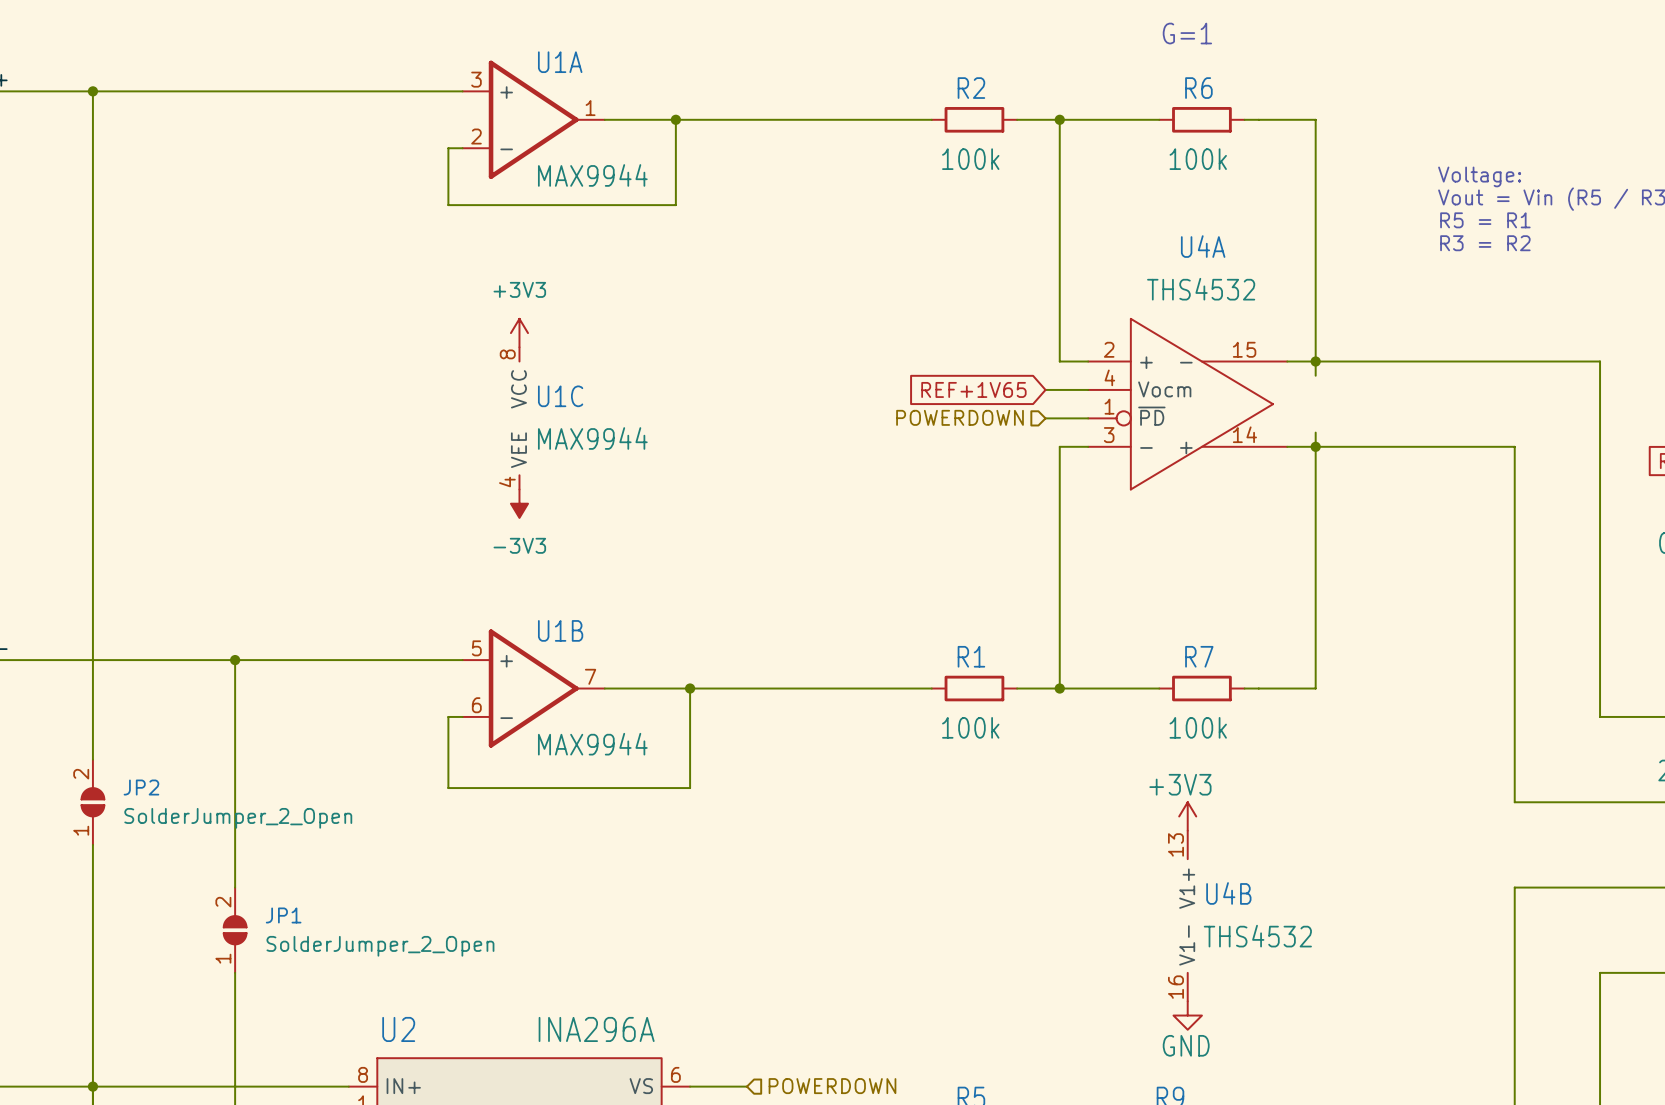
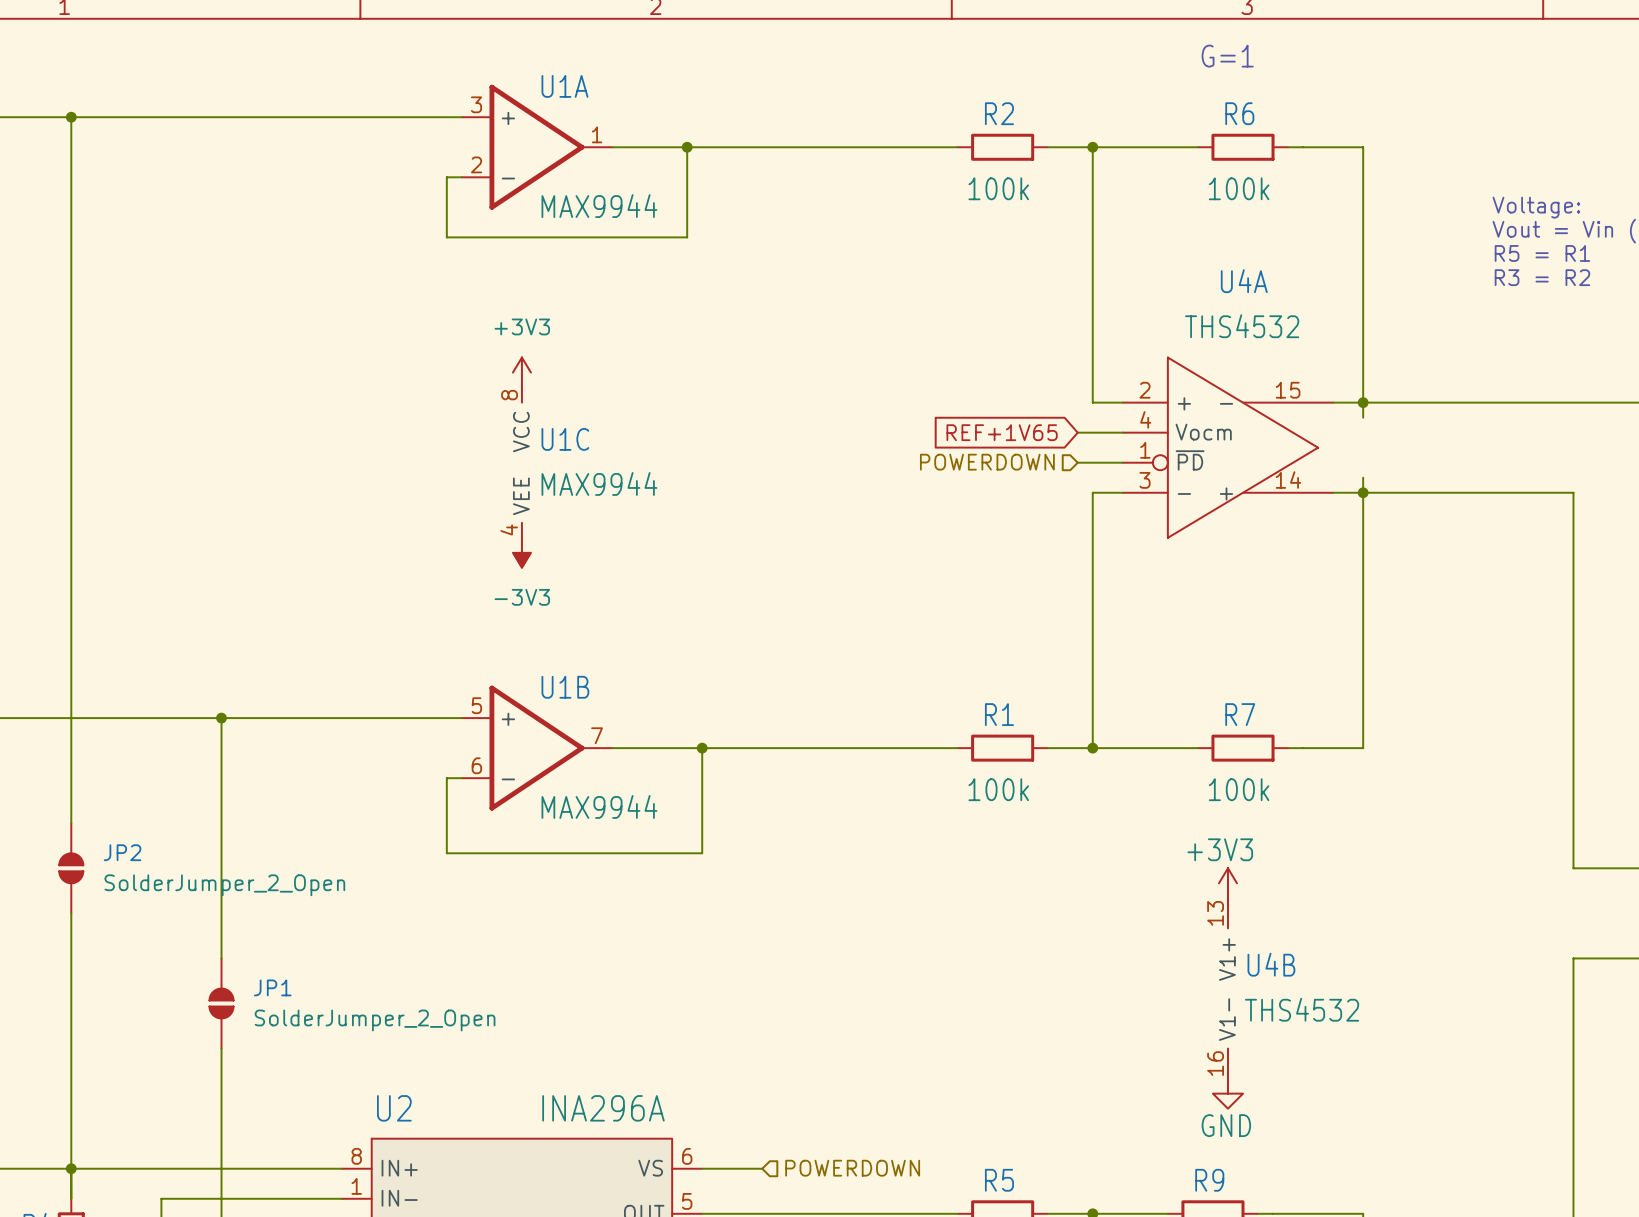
JP2 pin number: 2 (81, 774) -> none
JP2 pin number: 1 (81, 830) -> none
JP1 pin number: 2 (223, 902) -> none
JP1 pin number: 1 (223, 958) -> none

